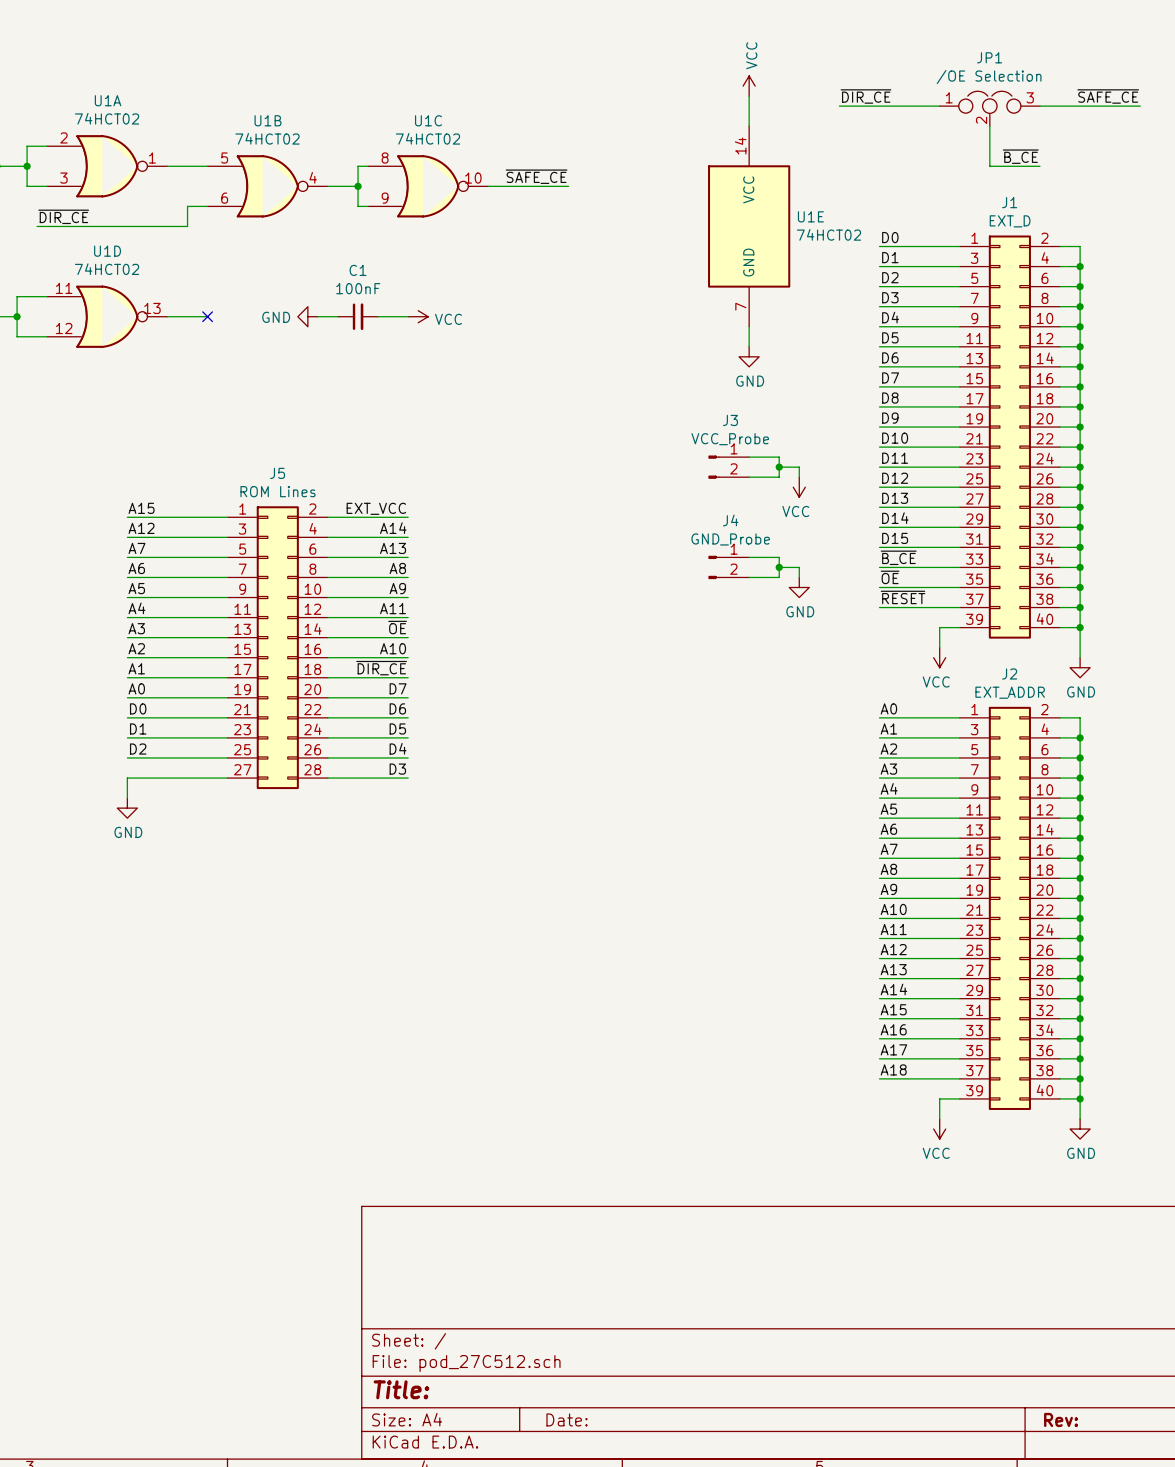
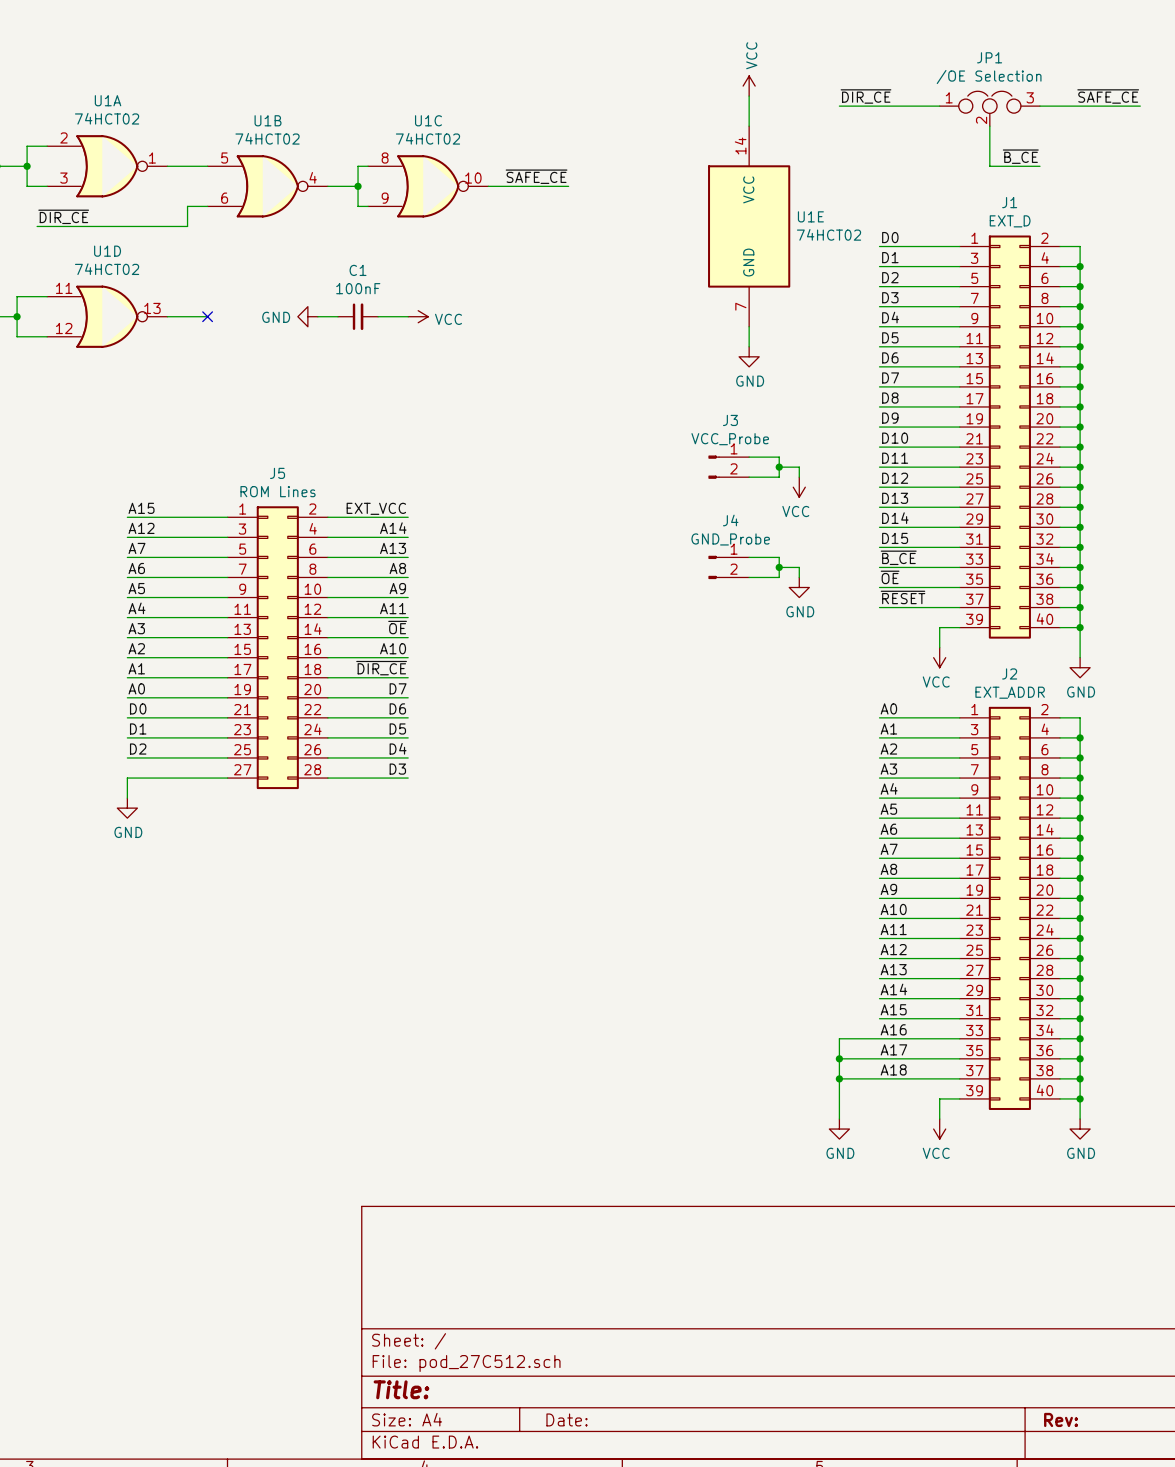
wire: none -> (879, 1038) (839, 1038) (839, 1119)
wire: none -> (839, 1058) (879, 1058)
junction: none -> (839, 1058)
wire: none -> (839, 1078) (879, 1078)
junction: none -> (839, 1078)
power symbol: none -> GND (839, 1129)

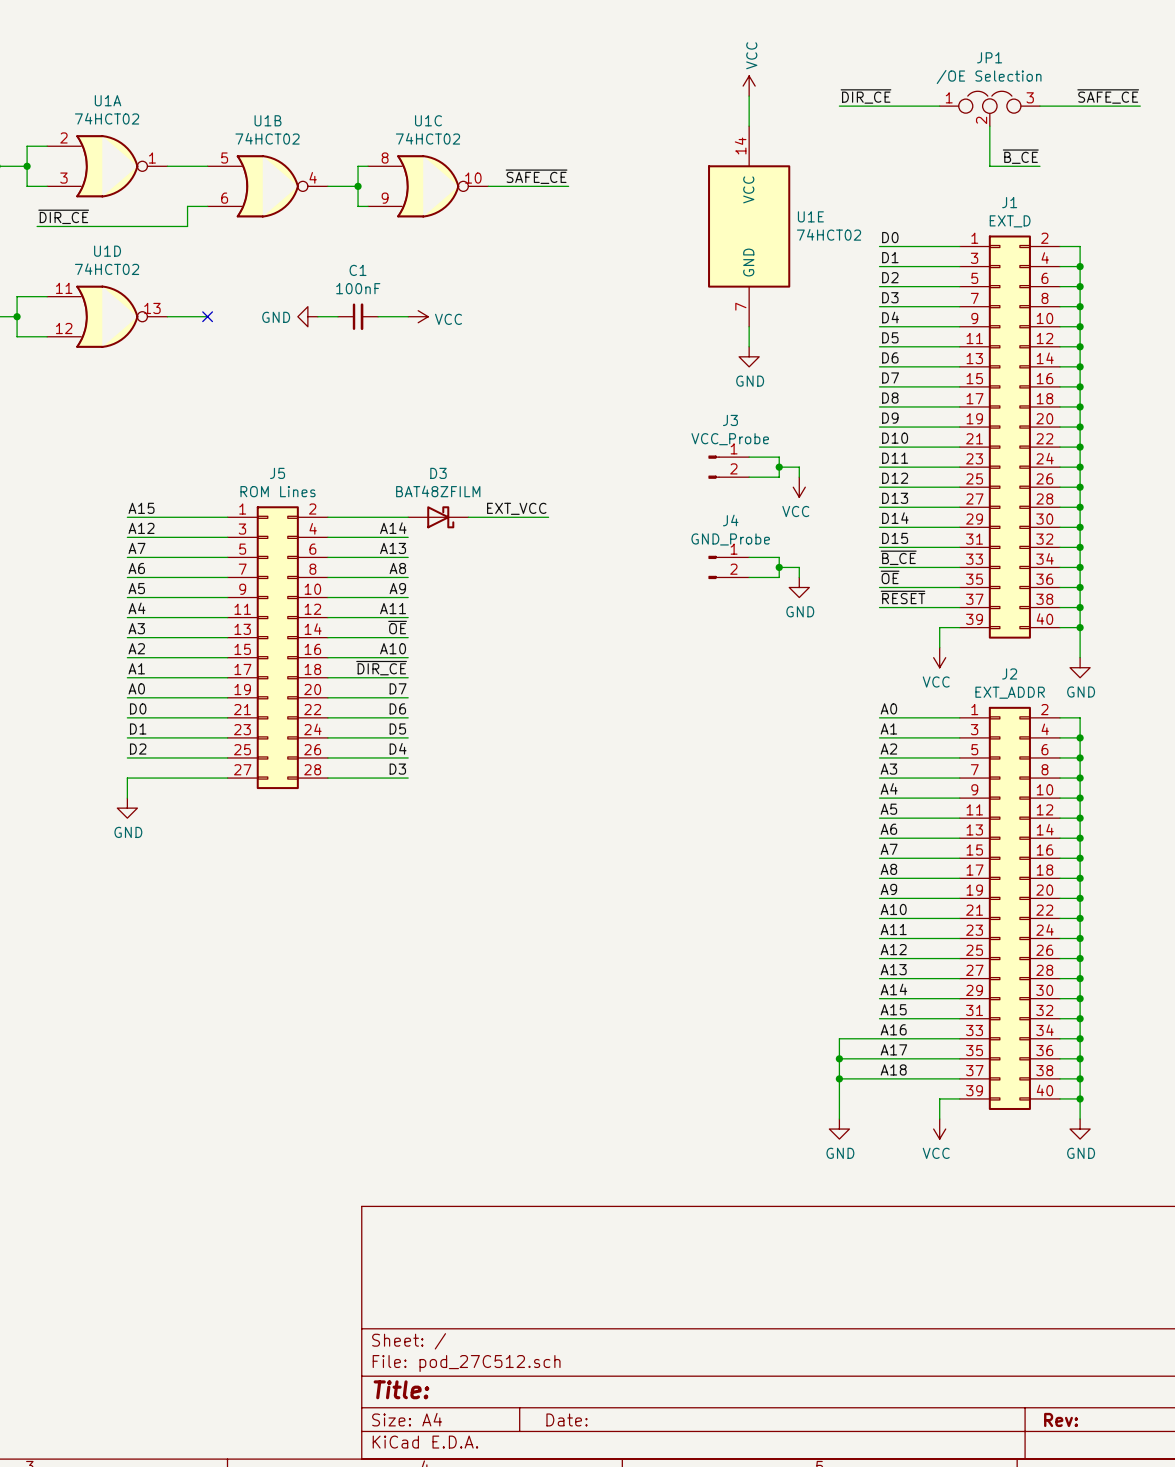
label position: EXT_VCC (376, 508) -> EXT_VCC (516, 508)
D3: none -> BAT48ZFILM (438, 517)
wire: none -> (468, 517) (548, 517)

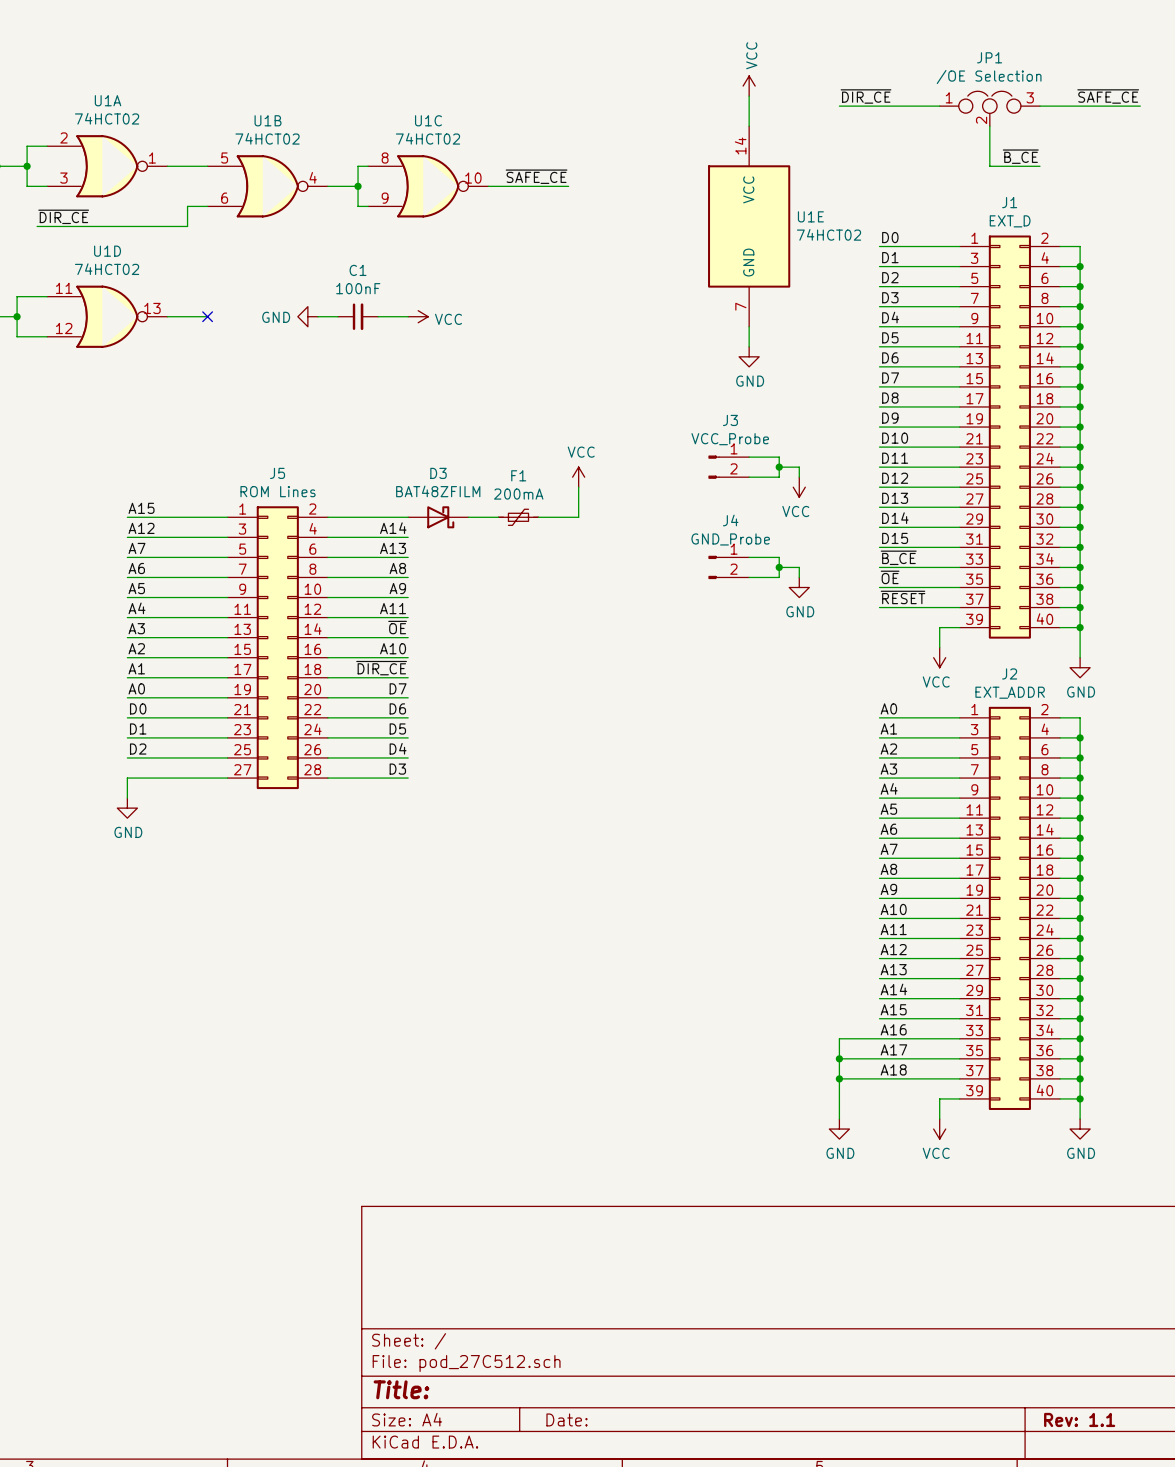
power symbol: none -> VCC (578, 477)
wire: none -> (578, 487) (578, 517) (548, 517)
label: EXT_VCC (516, 508) -> none
F1: none -> 200mA (518, 517)
title block: Rev: (1061, 1419) -> Rev: 1.1 (1079, 1419)

